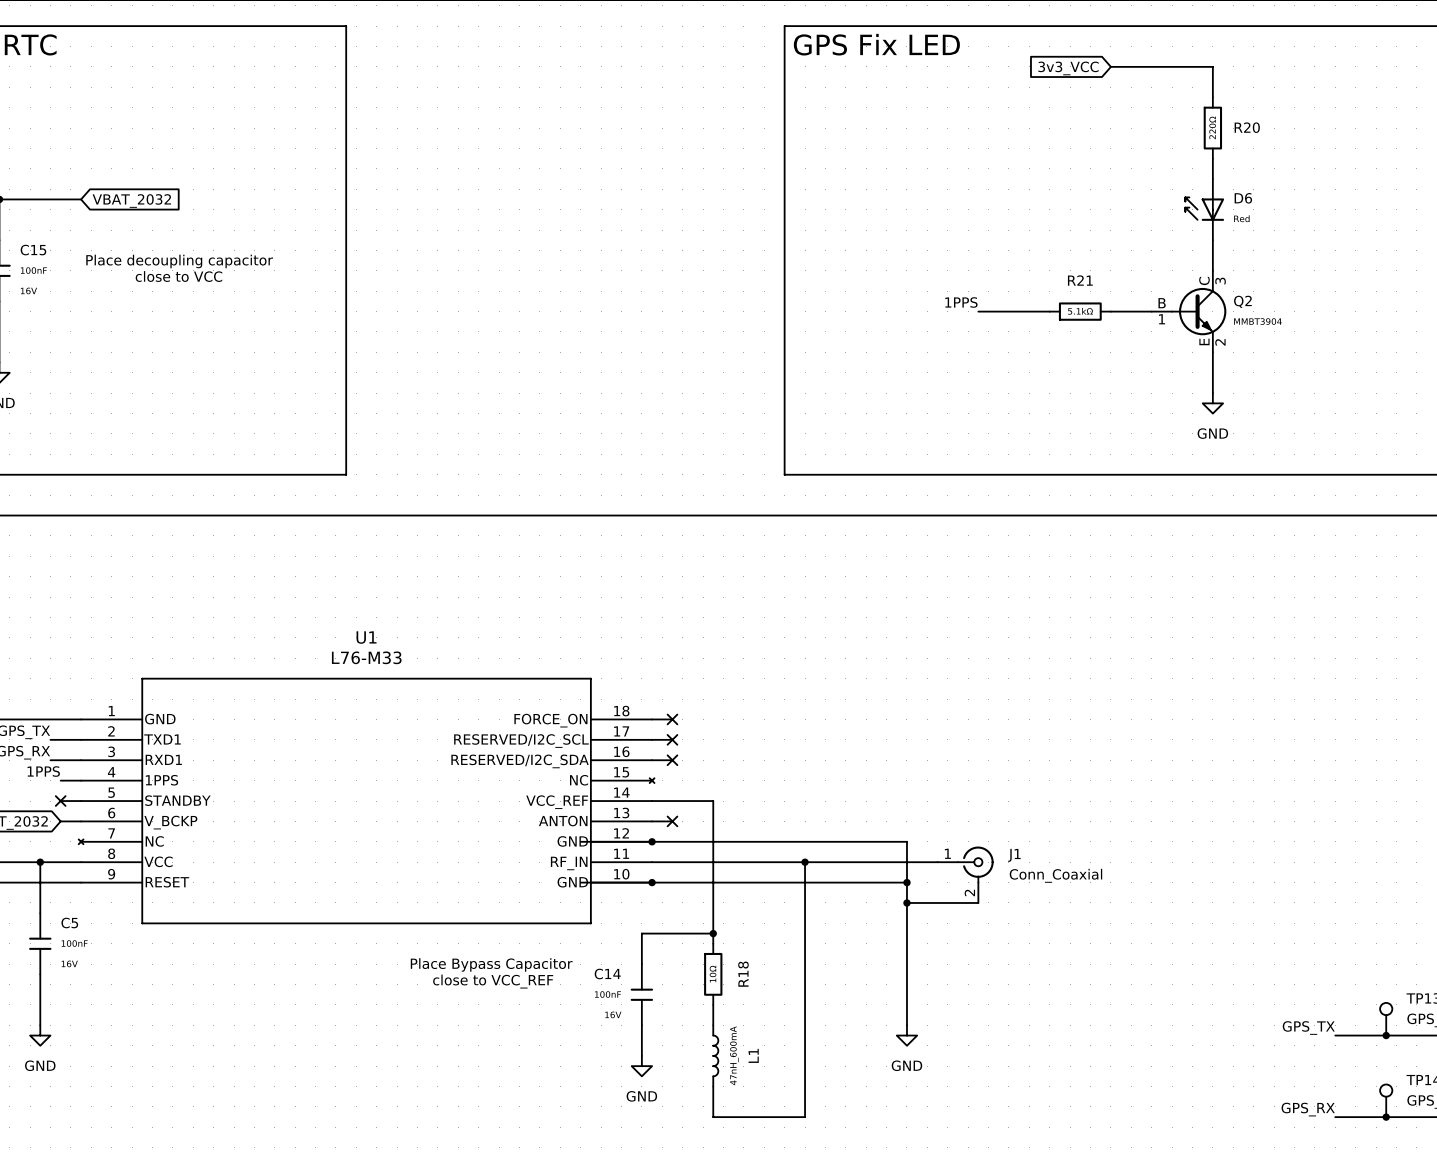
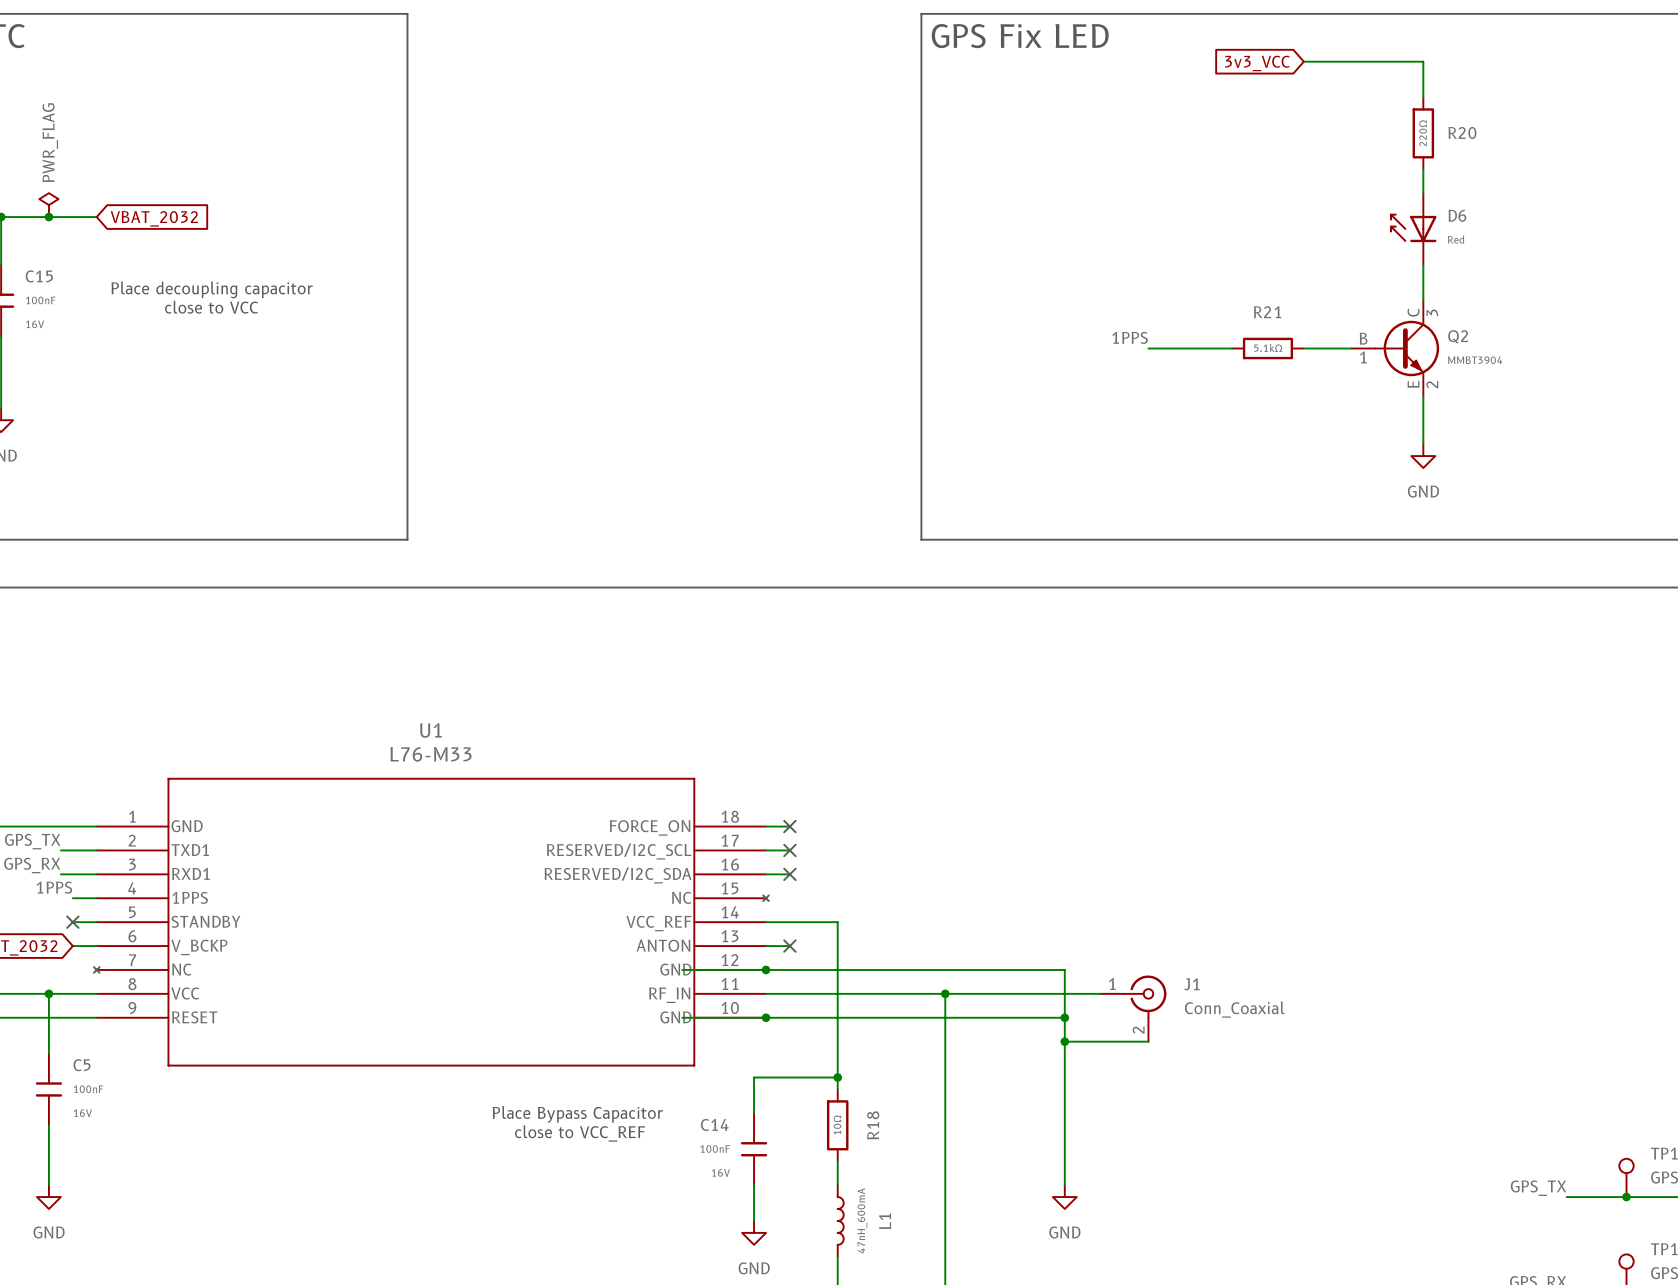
power symbol: none -> PWR_FLAG (48, 205)
junction: none -> (48, 217)

